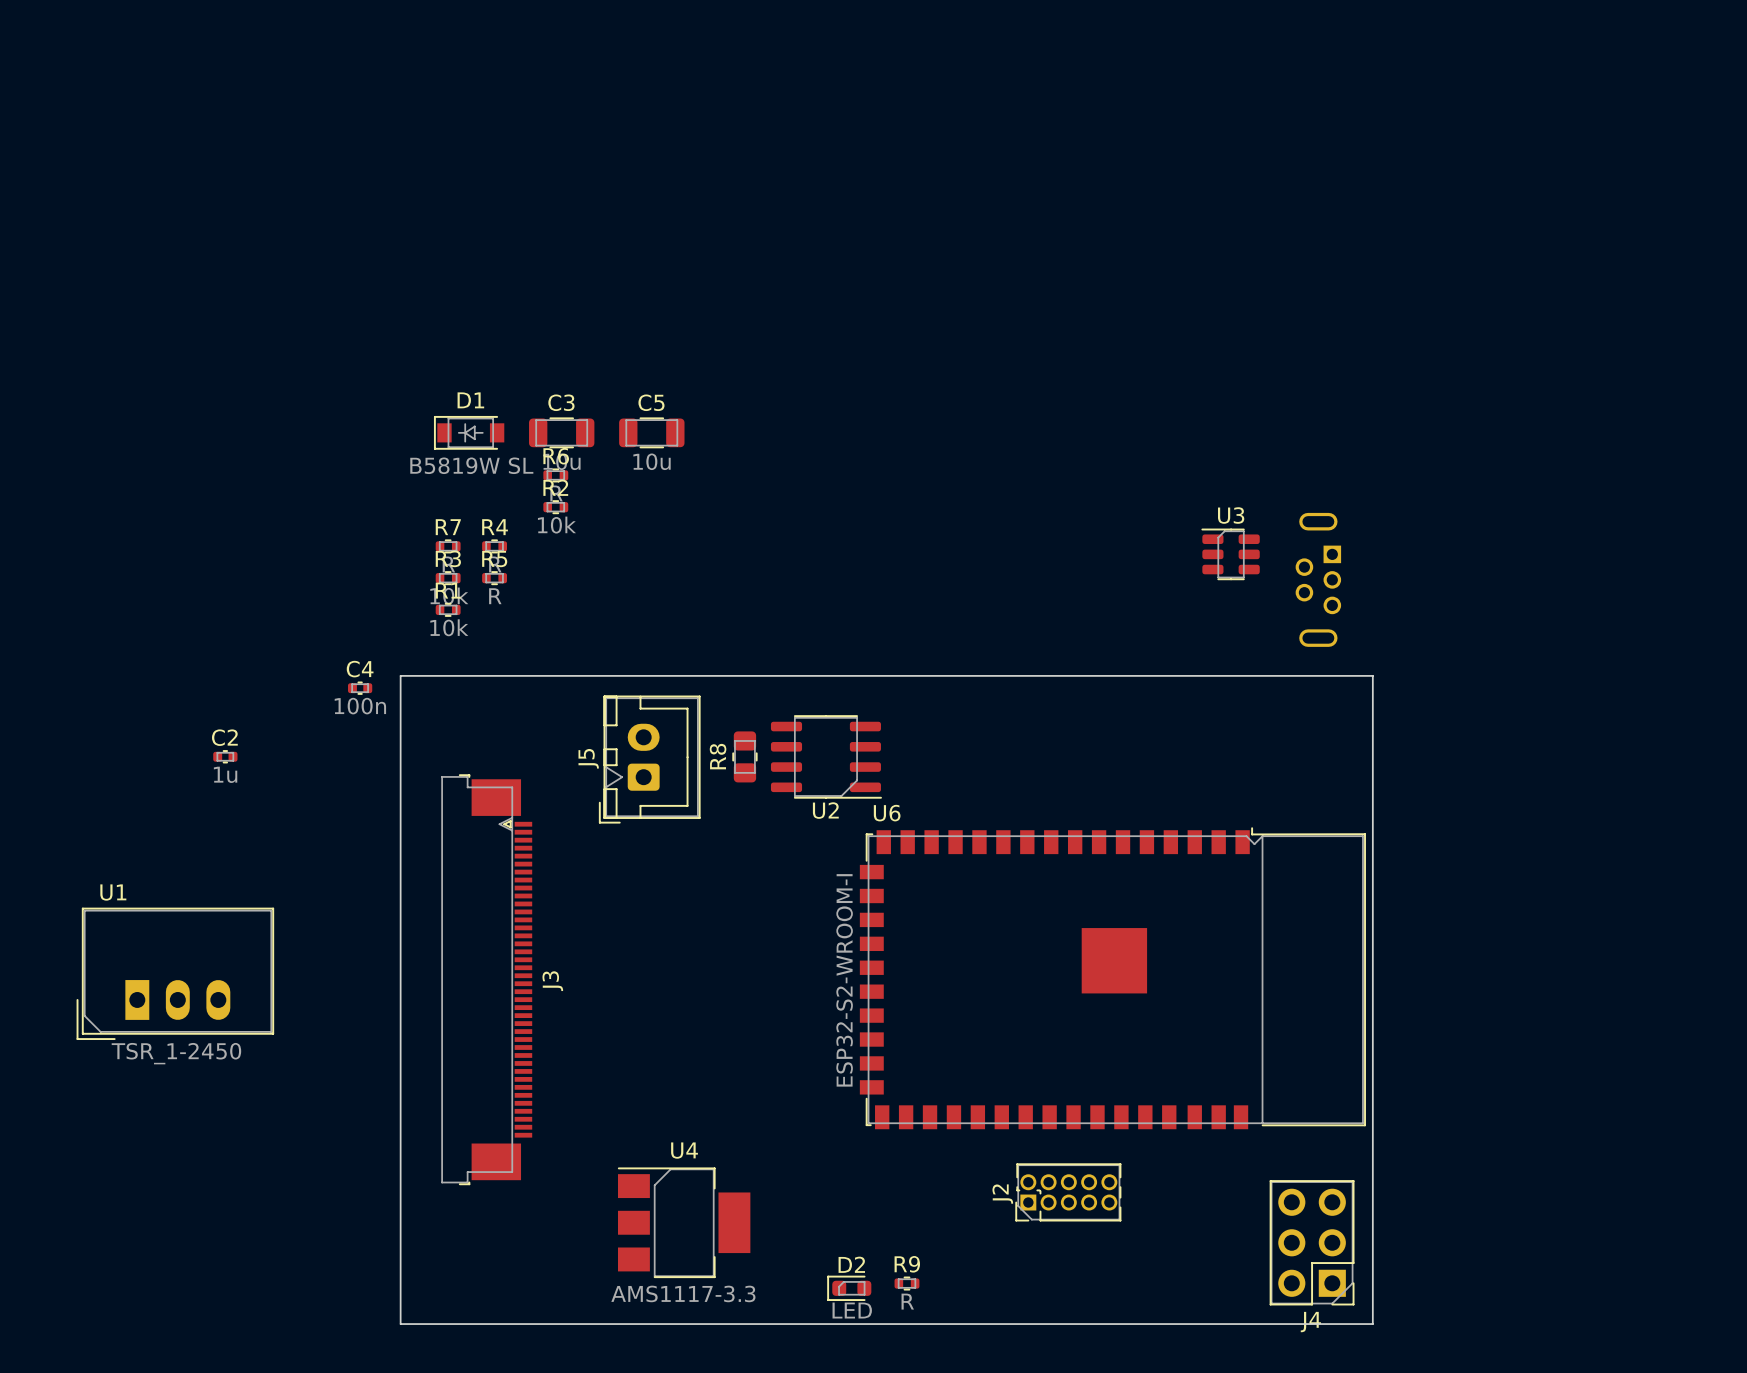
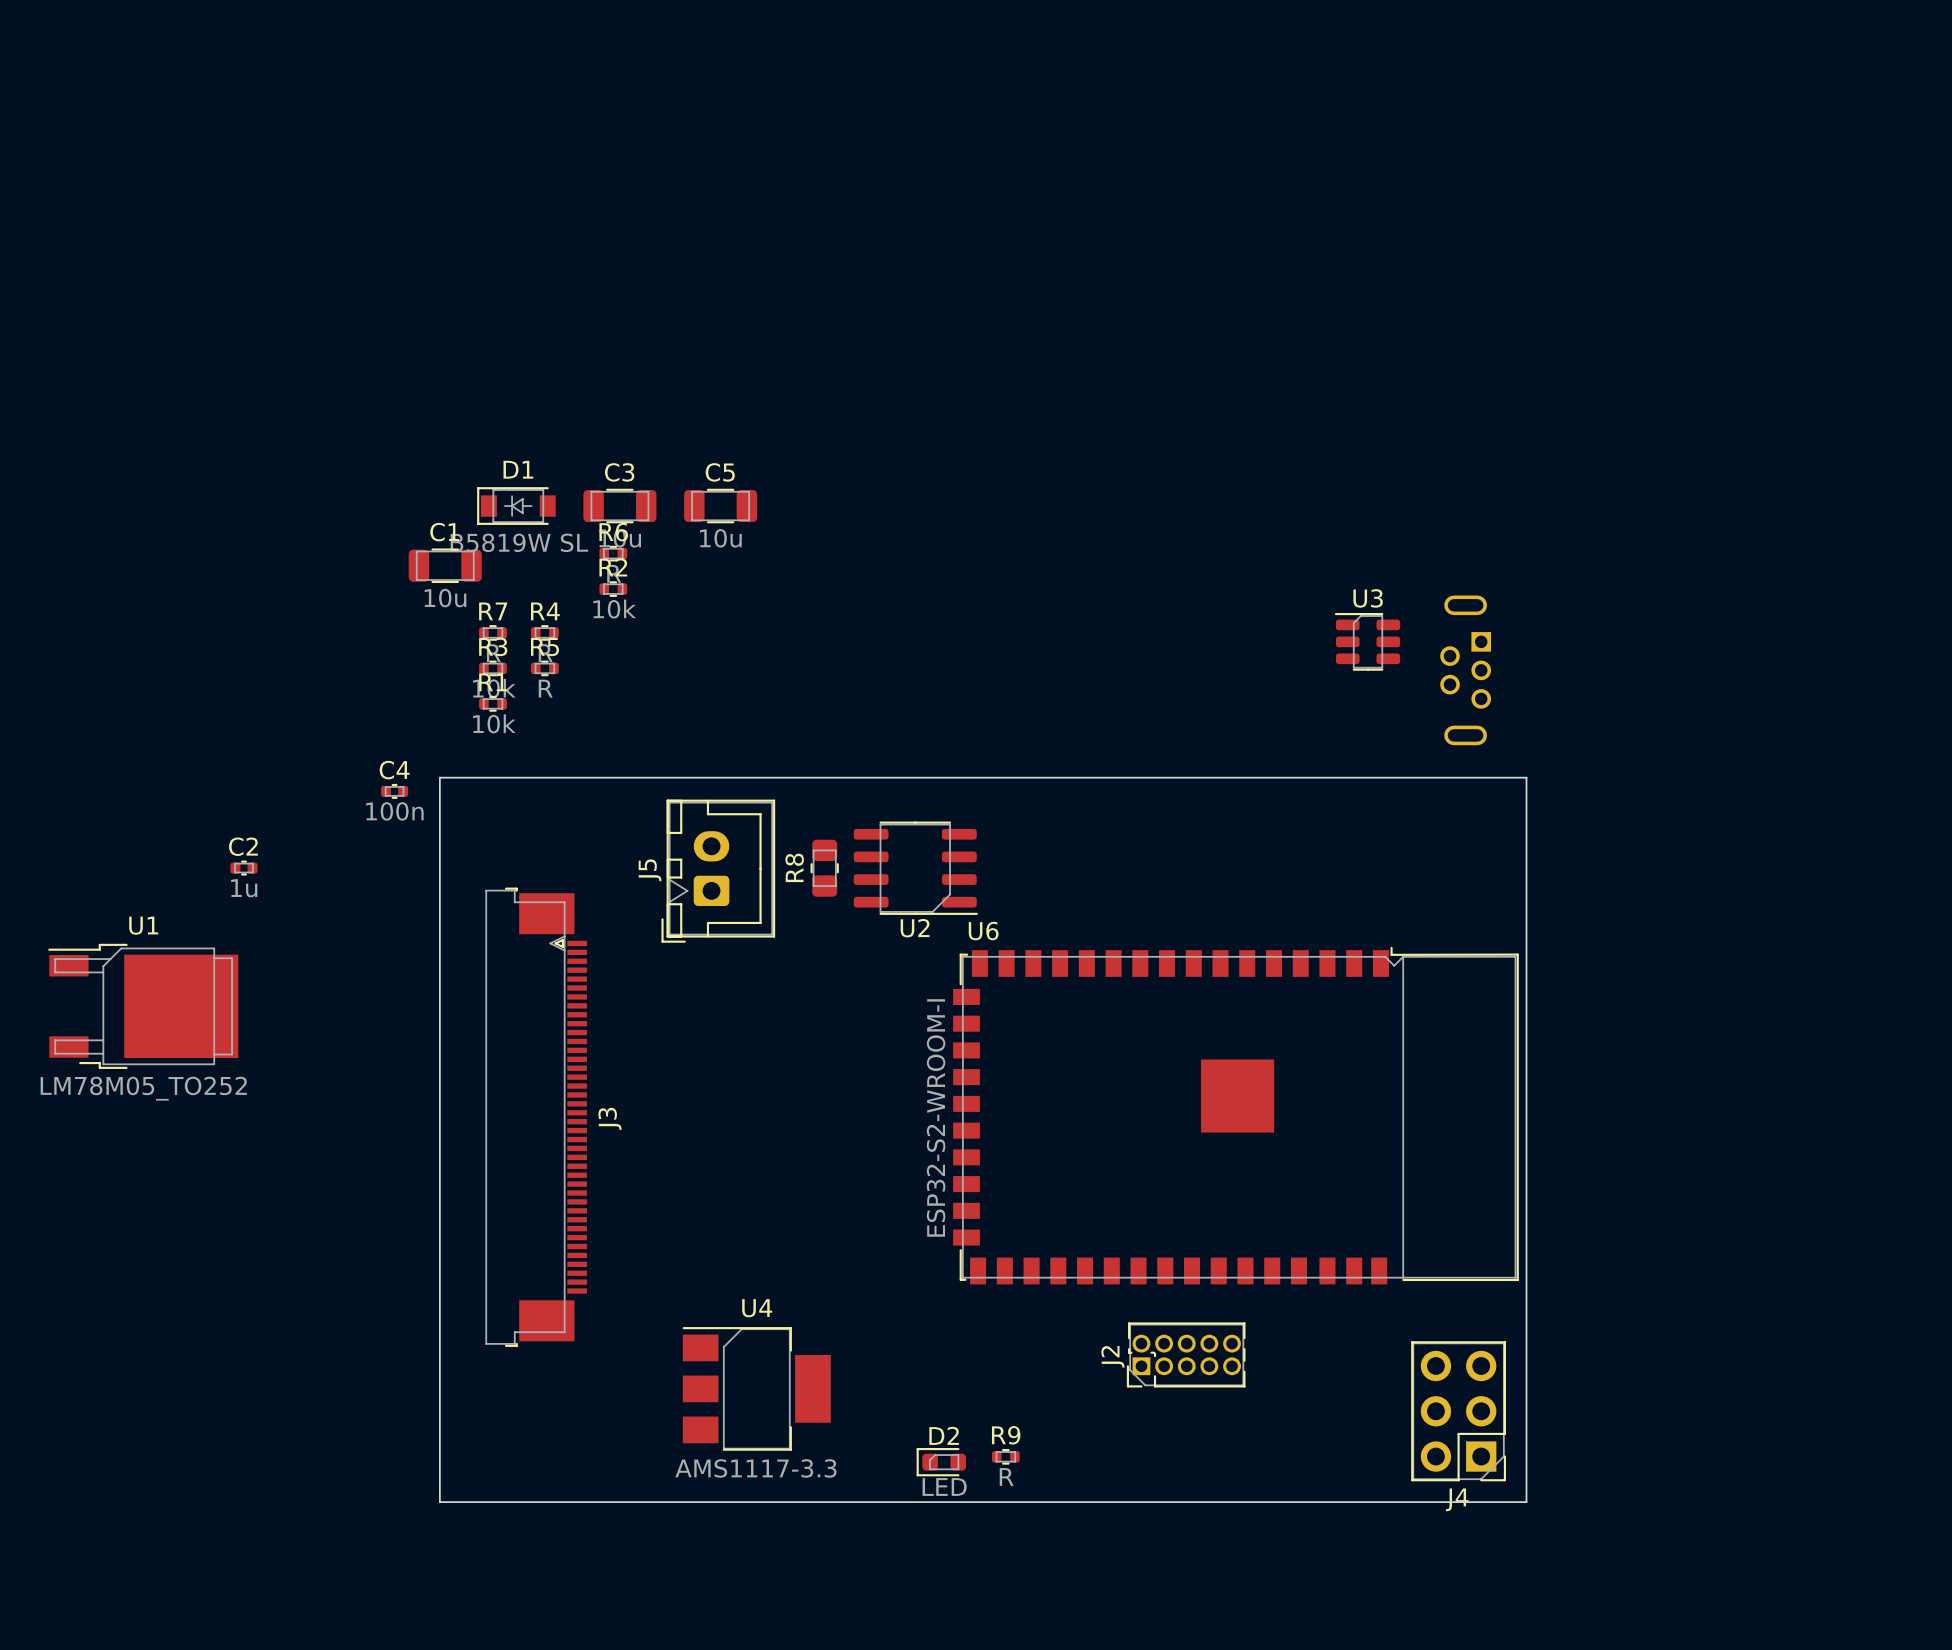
C1: none -> 10u (445, 565)
U1 name position: U1 (113, 892) -> U1 (143, 925)
U1 footprint: [76, 907, 275, 1041] -> [48, 943, 239, 1069]
U1 value: TSR_1-2450 (176, 1053) -> LM78M05_TO252 (143, 1088)

